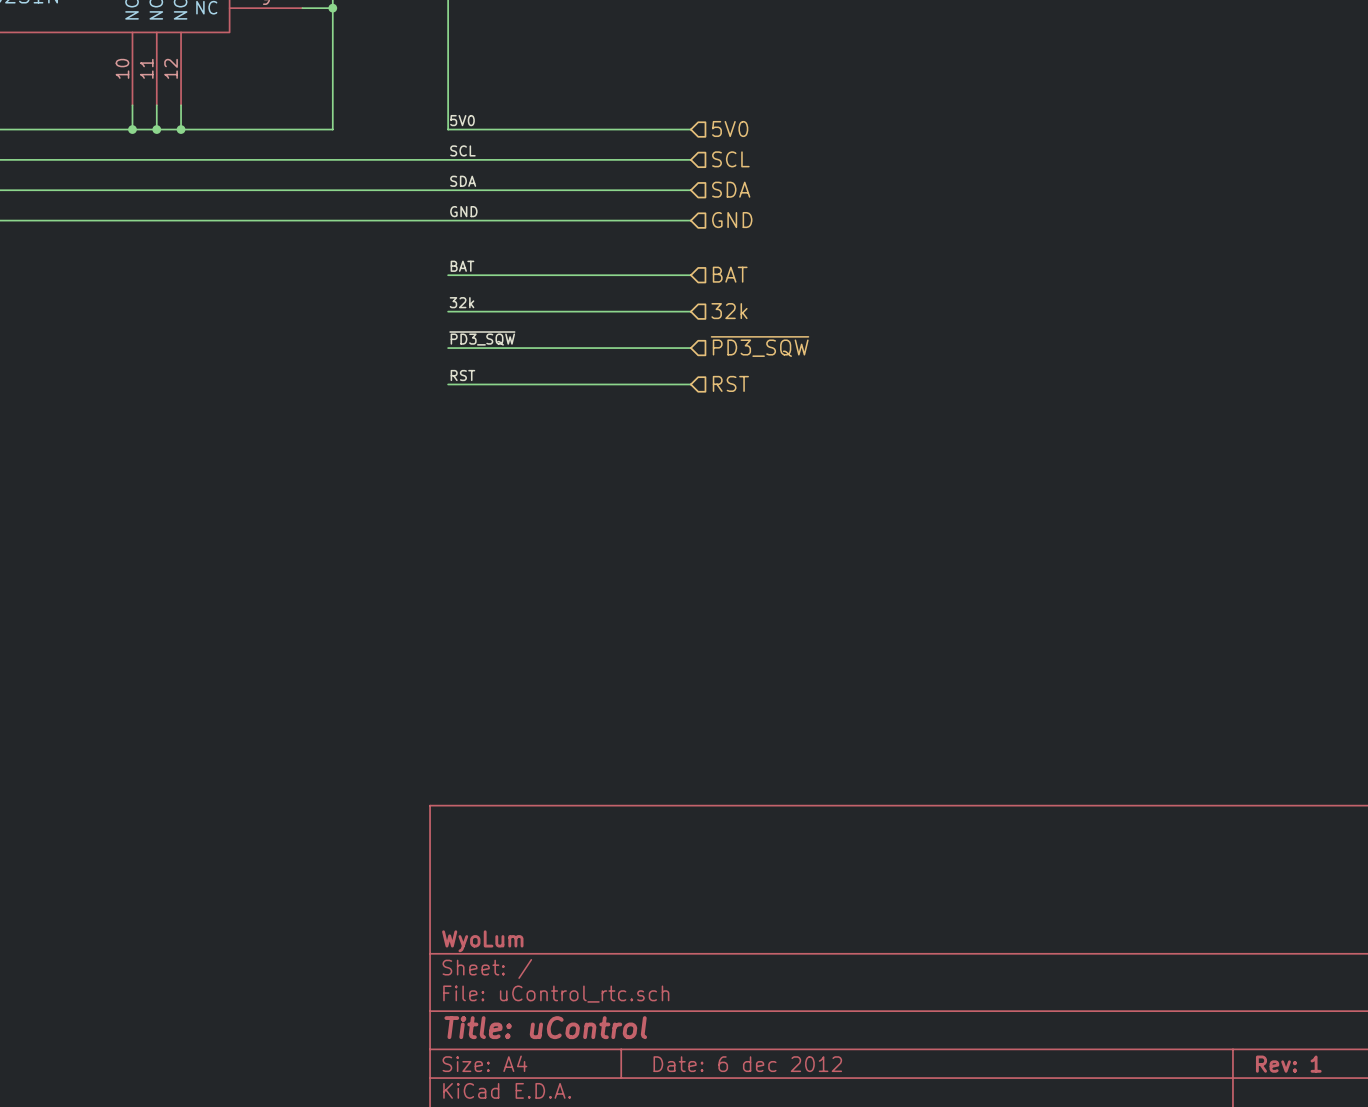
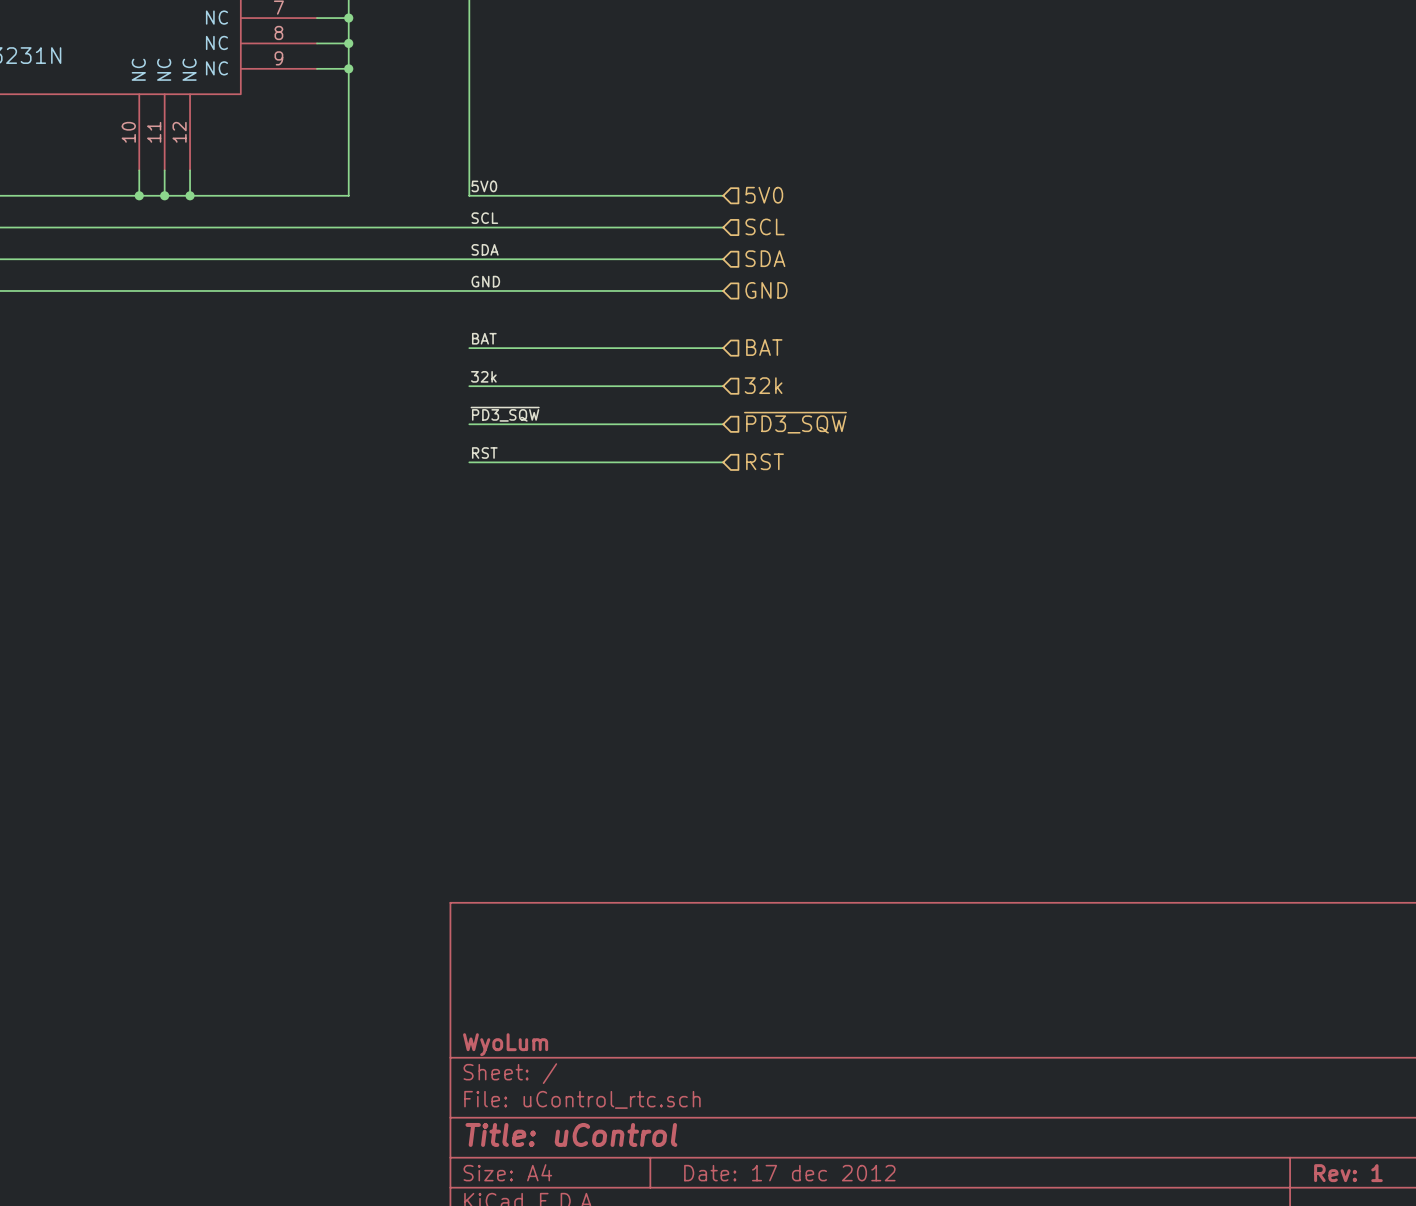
title block: Date: 6 dec 2012 (747, 1064) -> Date: 17 dec 2012 (789, 1173)

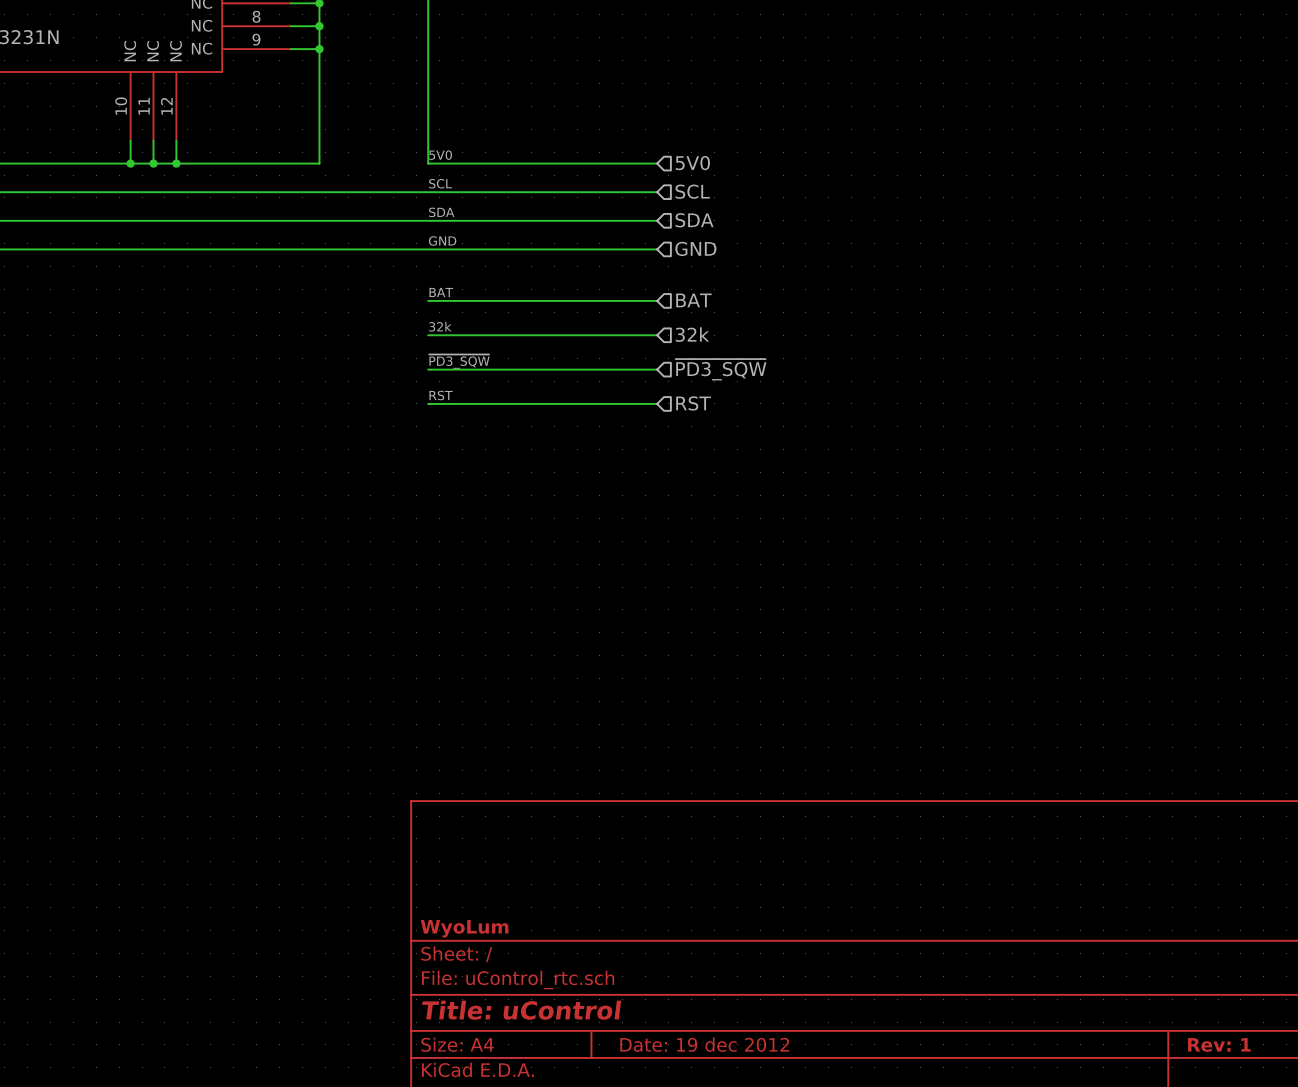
title block: Date: 17 dec 2012 (789, 1173) -> Date: 19 dec 2012 (704, 1044)

